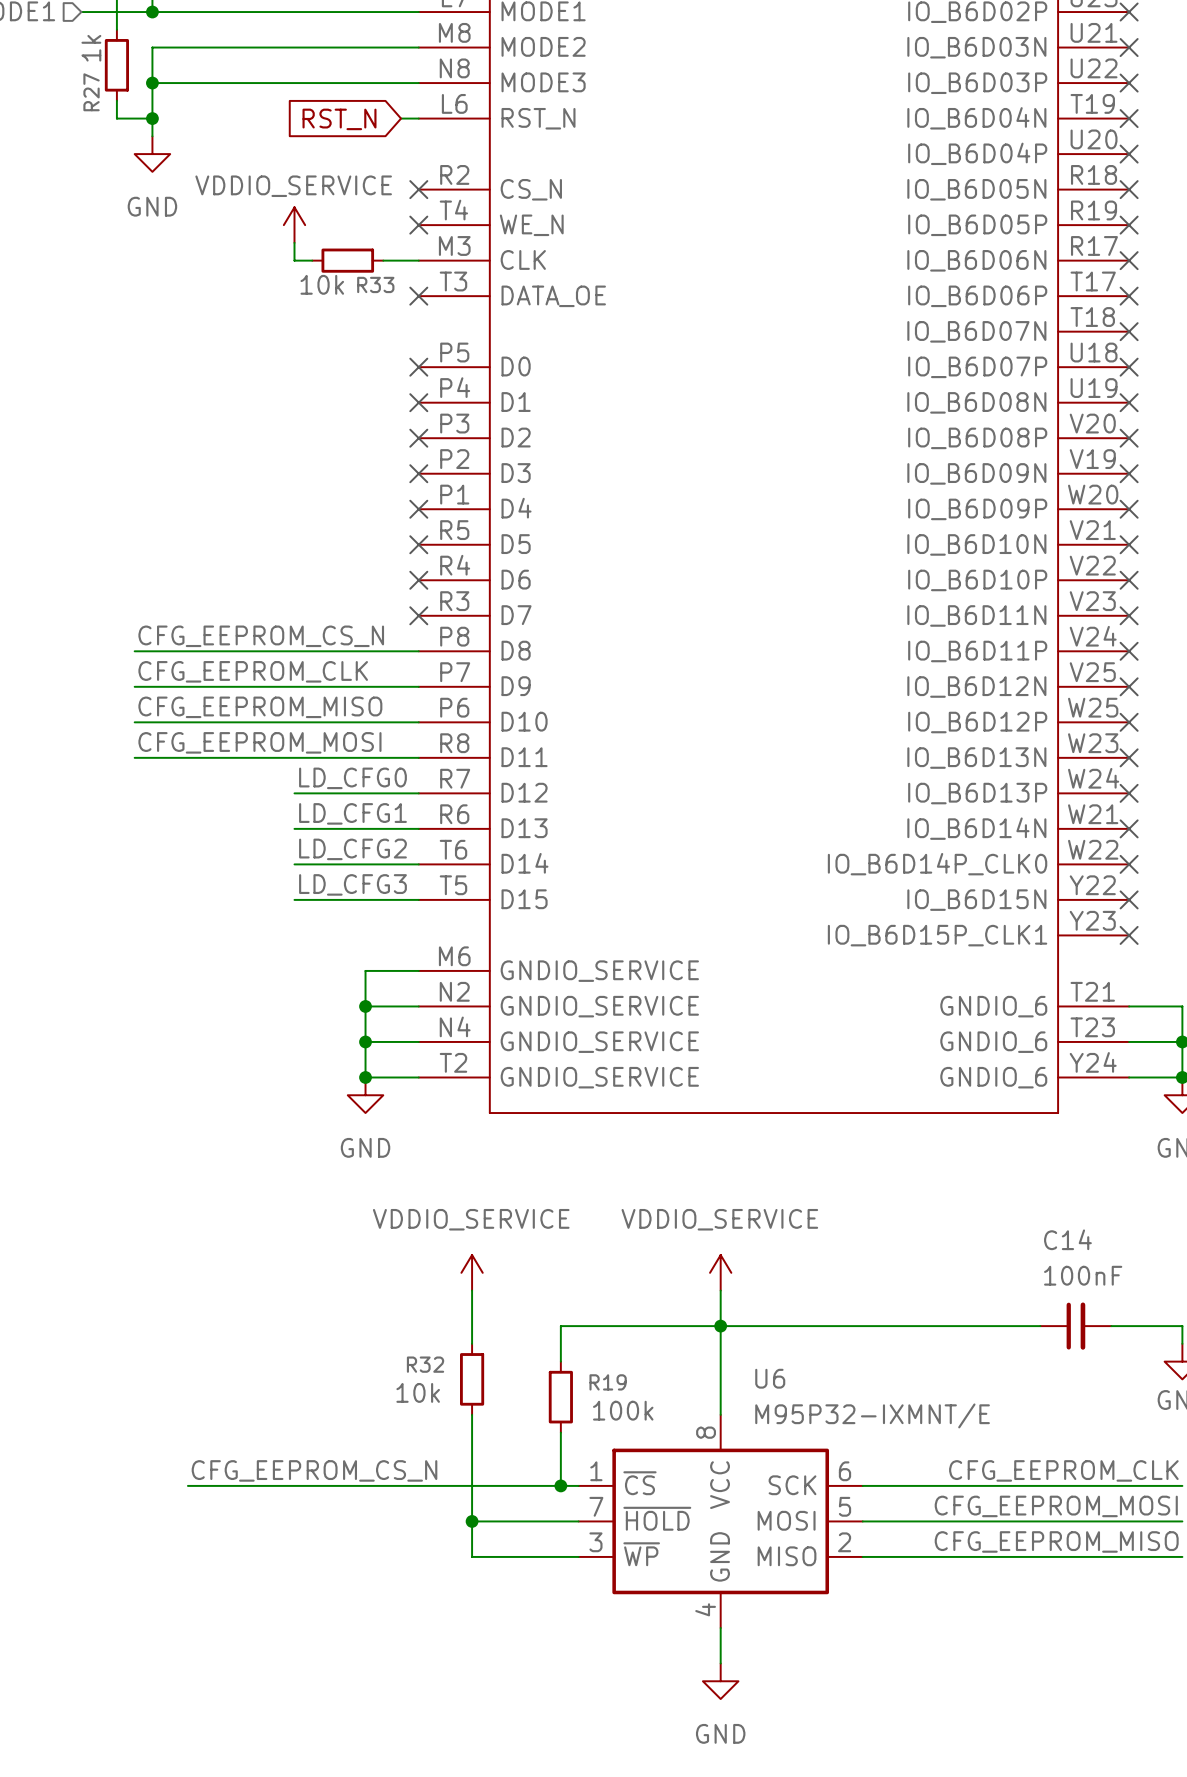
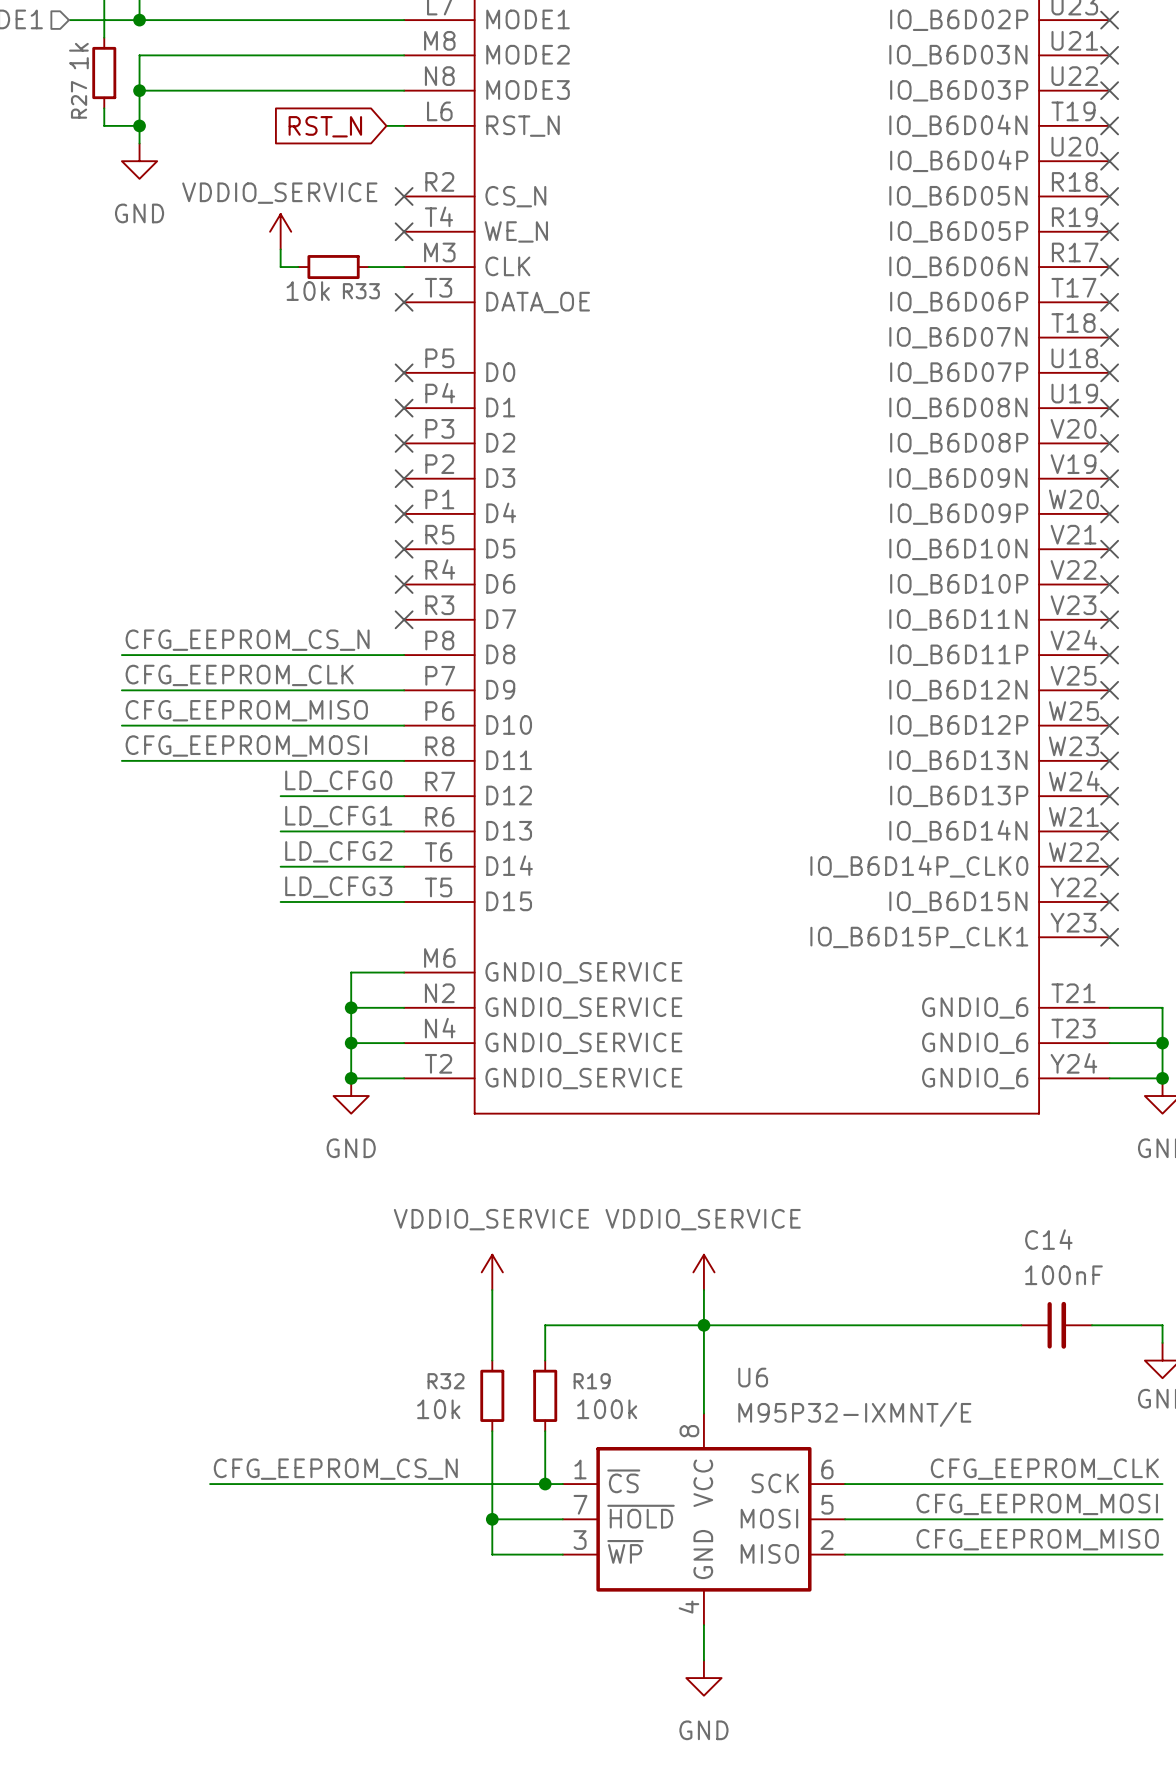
power symbol position: VDDIO_SERVICE (472, 1272) -> VDDIO_SERVICE (492, 1272)
wire: (472, 1290) (472, 1343) -> none
wire: none -> (492, 1290) (492, 1360)
R32 position: (472, 1379) -> (492, 1395)
wire: (472, 1414) (472, 1556) (507, 1556) -> (492, 1431) (492, 1554)
label position: CFG_EEPROM_CS_N (314, 1470) -> CFG_EEPROM_CS_N (335, 1469)
wire: (187, 1485) (223, 1485) -> none
wire: (472, 1521) (507, 1521) -> none
junction position: (472, 1521) -> (492, 1519)

